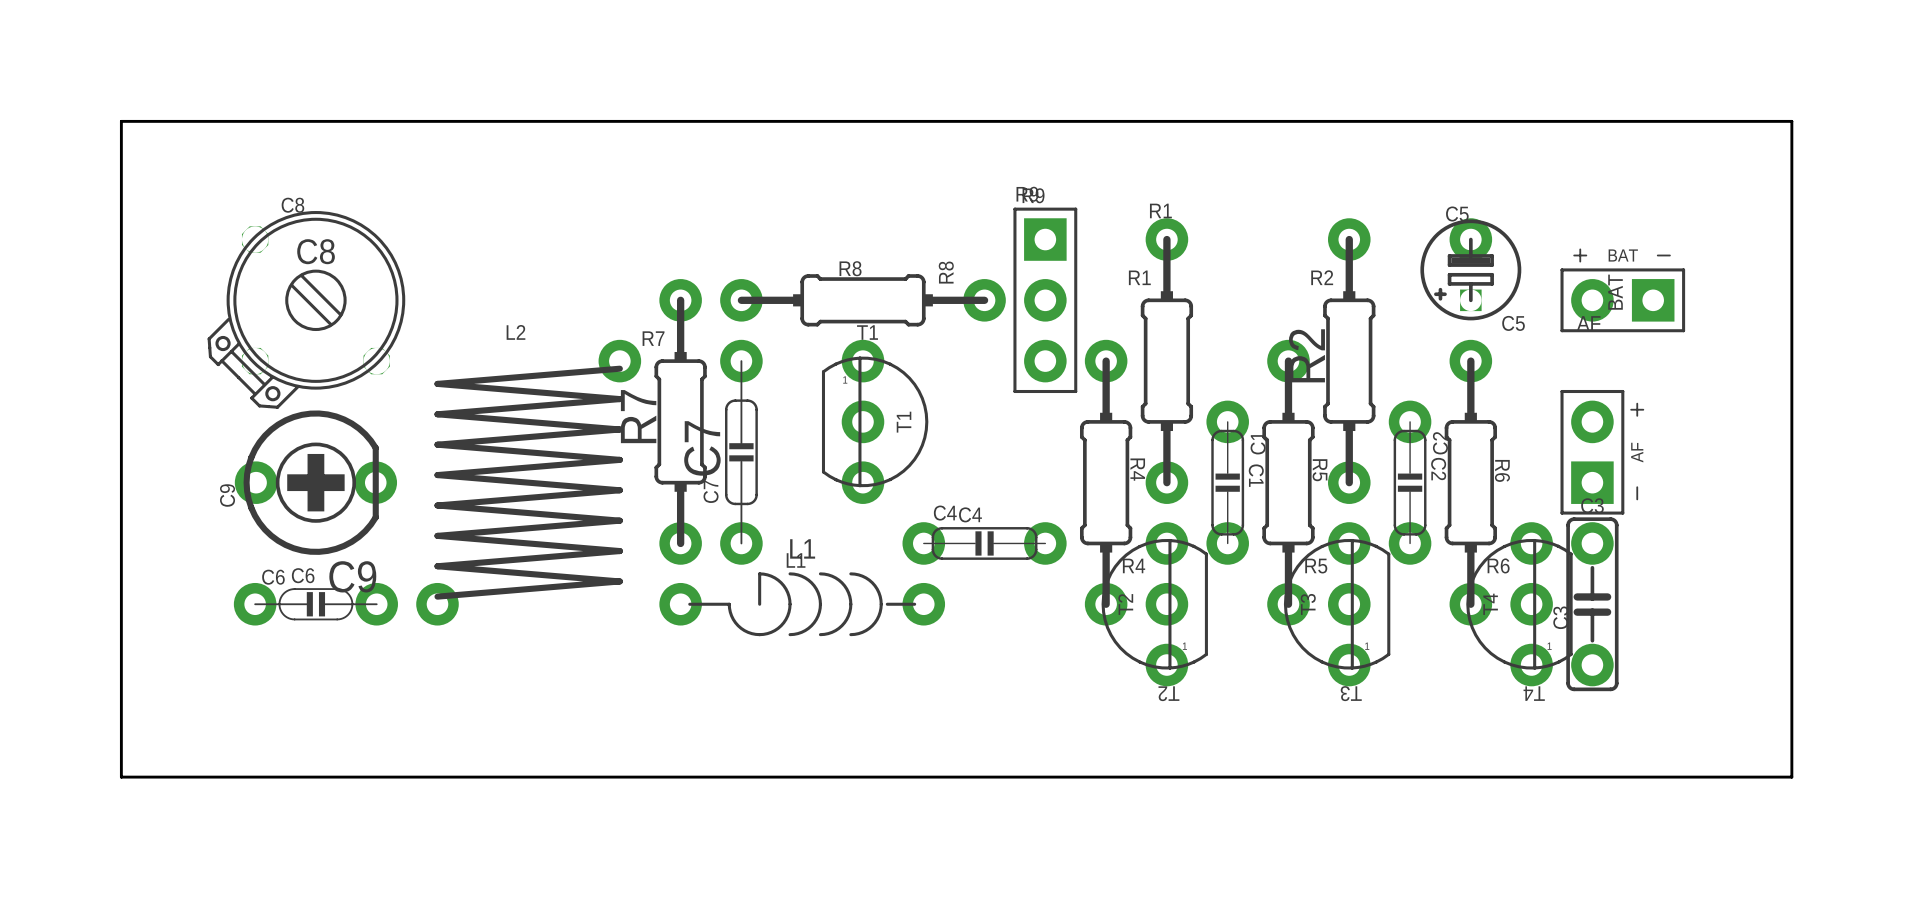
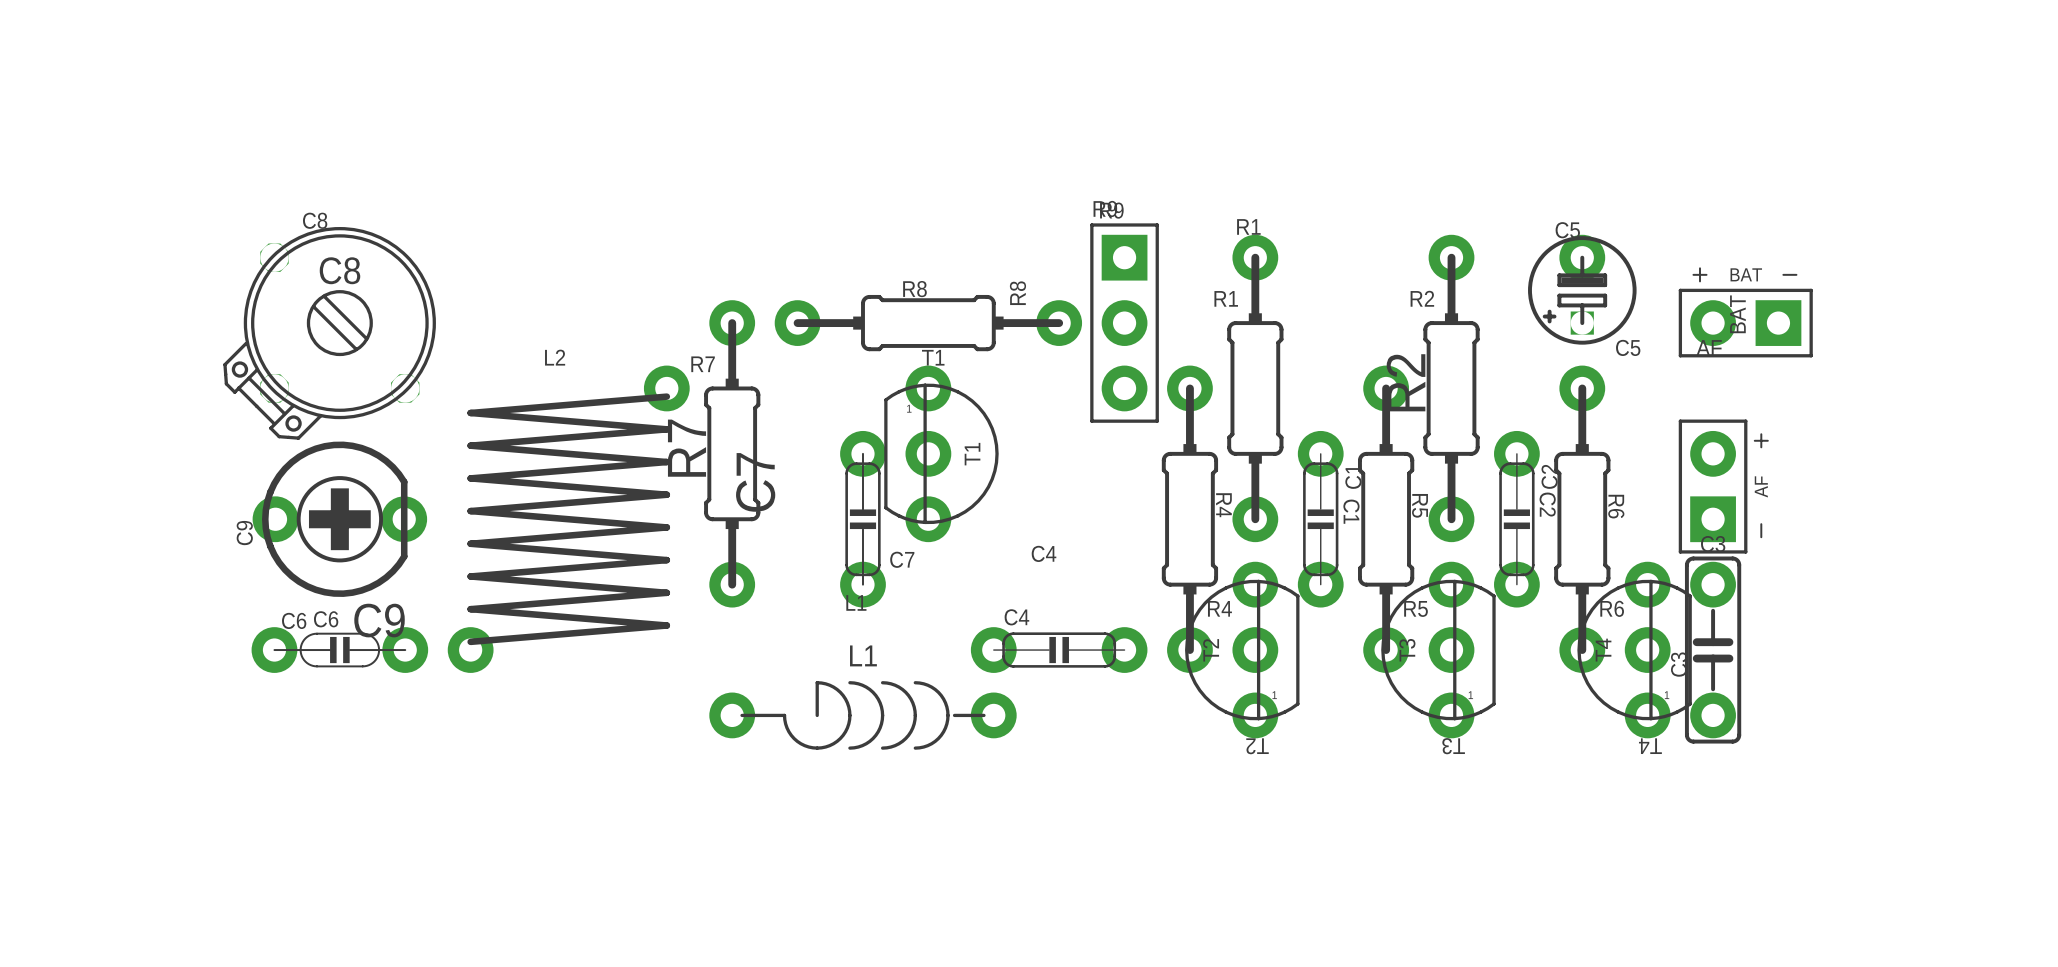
board edge: (121, 121) (1791, 121) (1791, 777) (121, 777) (121, 121) -> none
C7 footprint: [720, 339, 763, 565] -> [840, 430, 886, 608]
C7 name position: C7 (711, 491) -> C7 (902, 559)
C4 position: (984, 543) -> (1059, 650)
L1 position: (802, 604) -> (862, 715)

